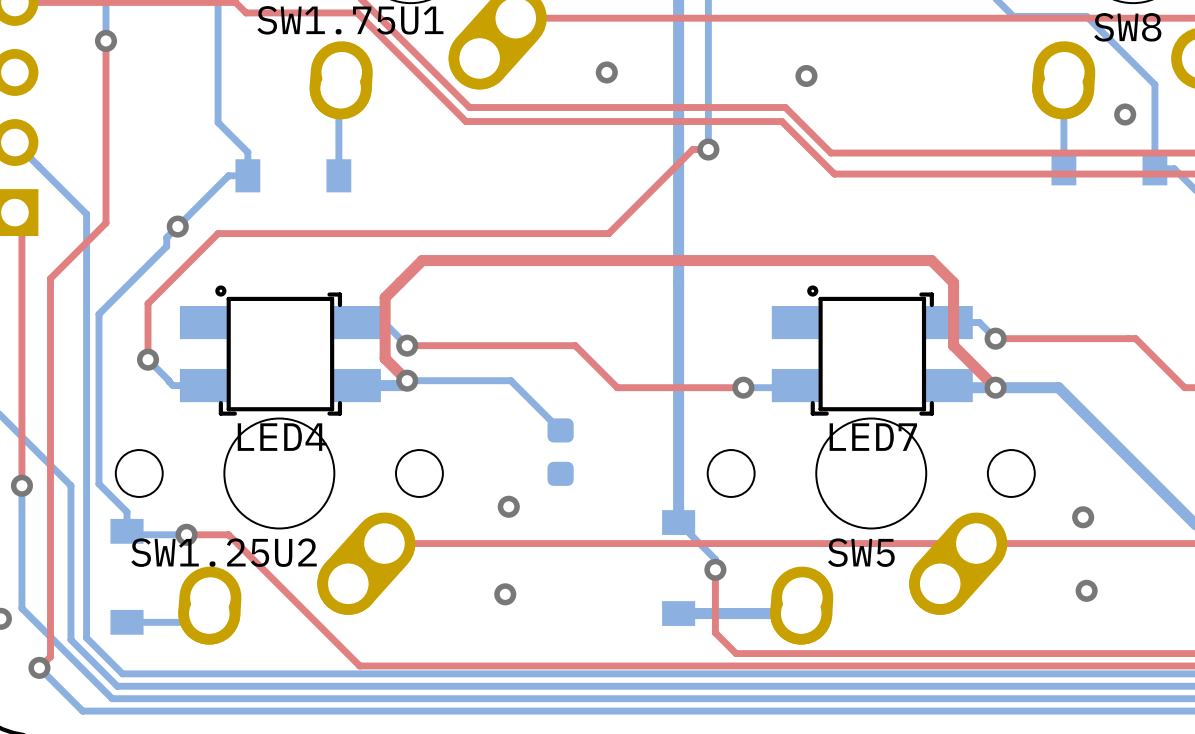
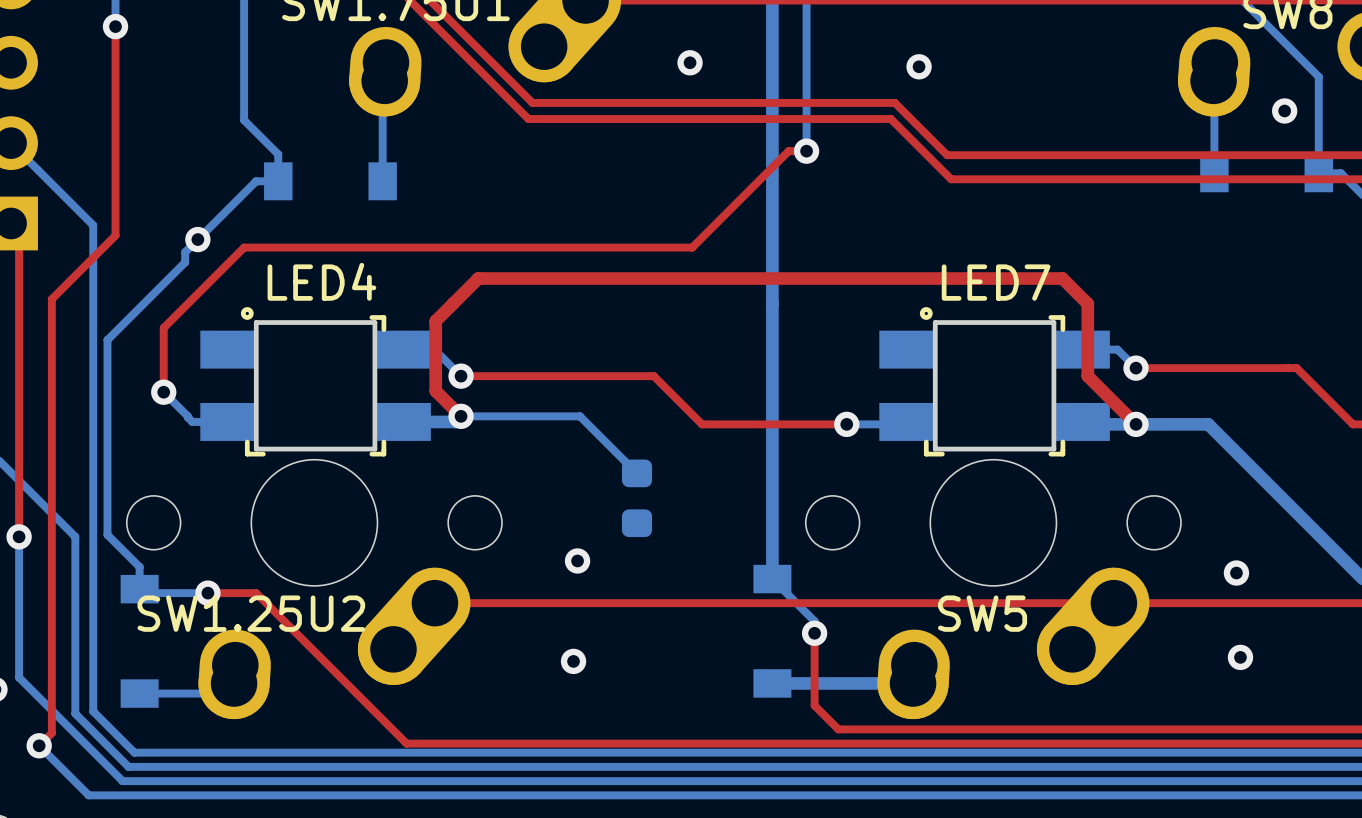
LED4 name position: LED4 (282, 437) -> LED4 (321, 281)
LED7 name position: LED7 (873, 437) -> LED7 (996, 282)

